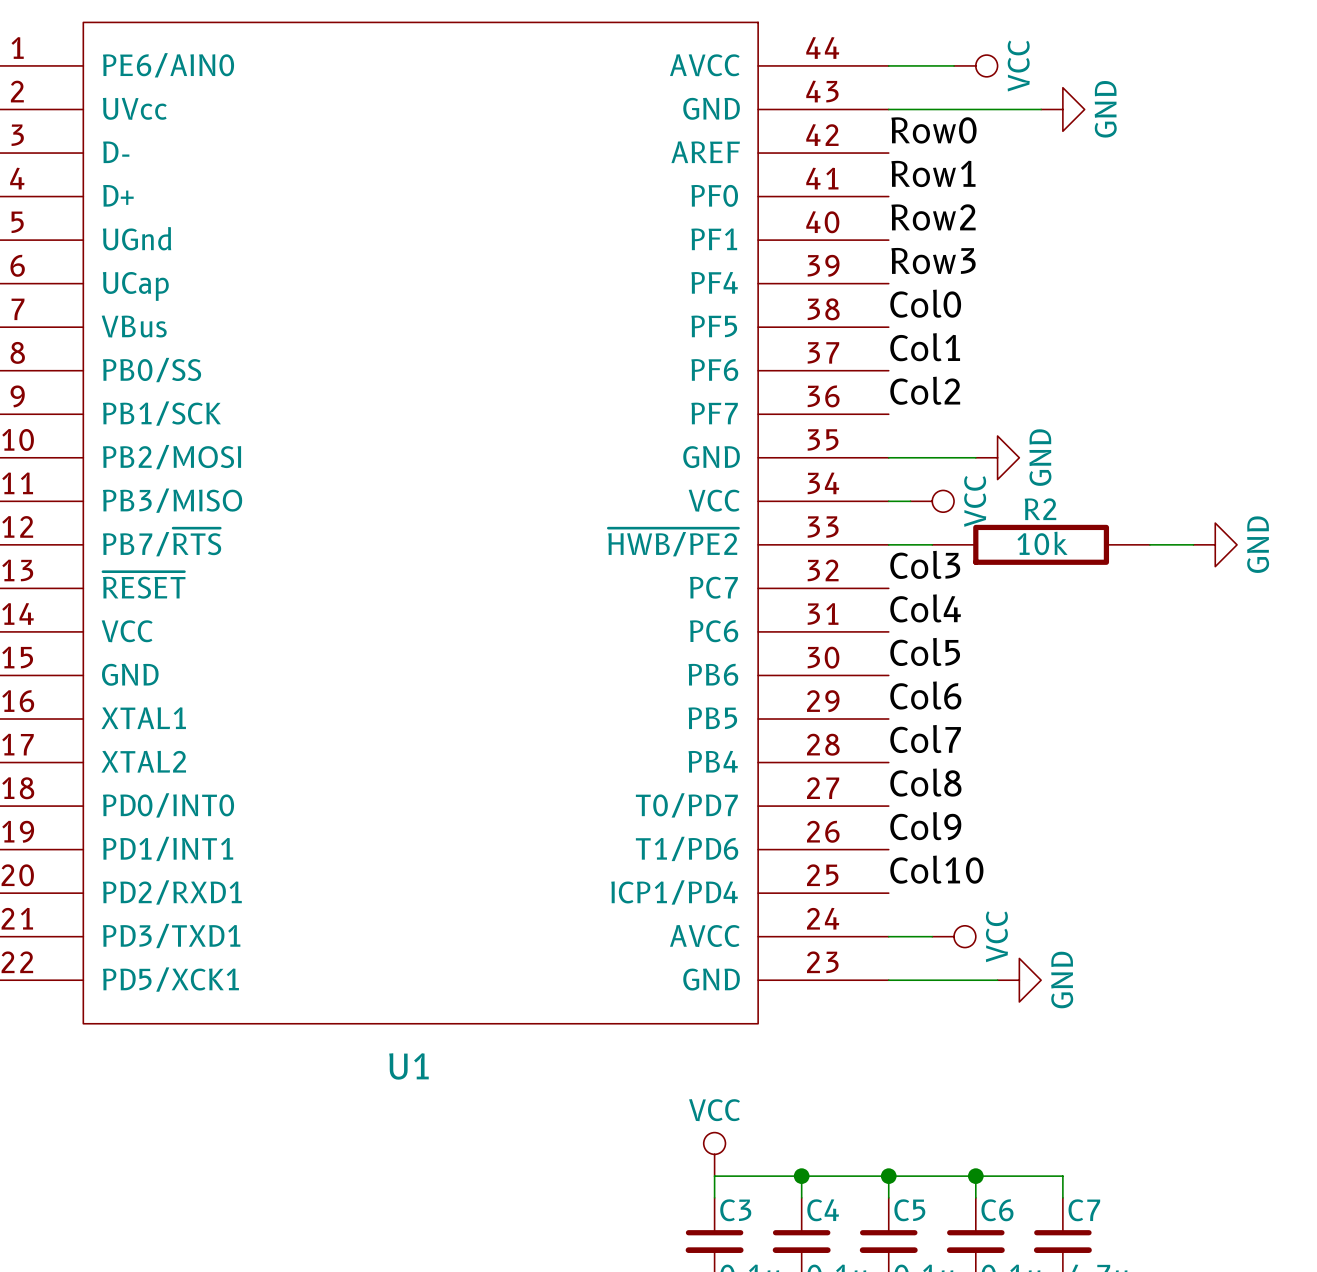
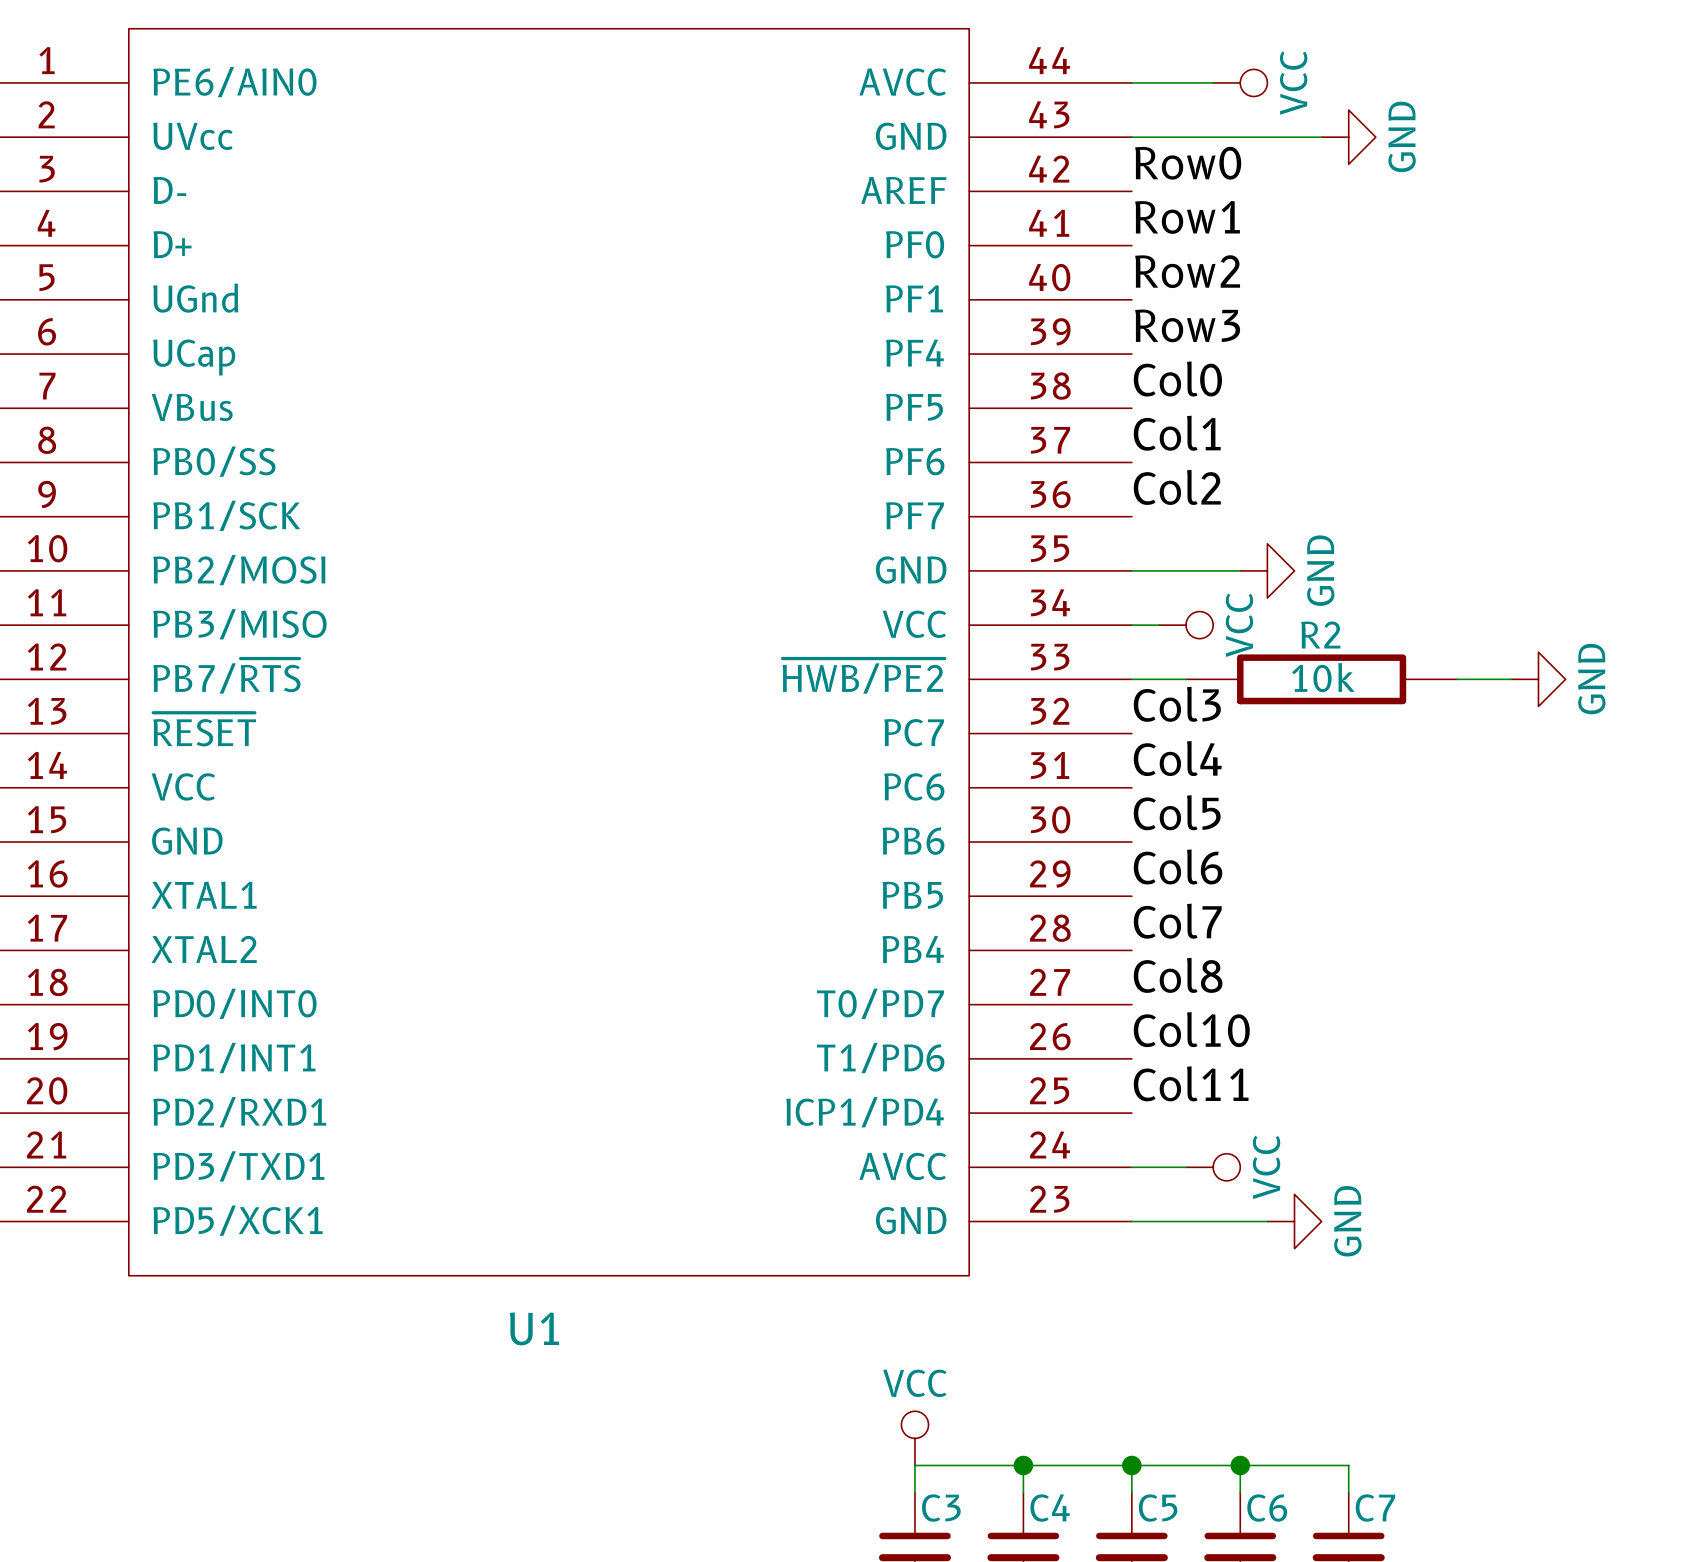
label: Col9 (925, 826) -> Col10 (1191, 1029)
label: Col10 (936, 869) -> Col11 (1191, 1083)

